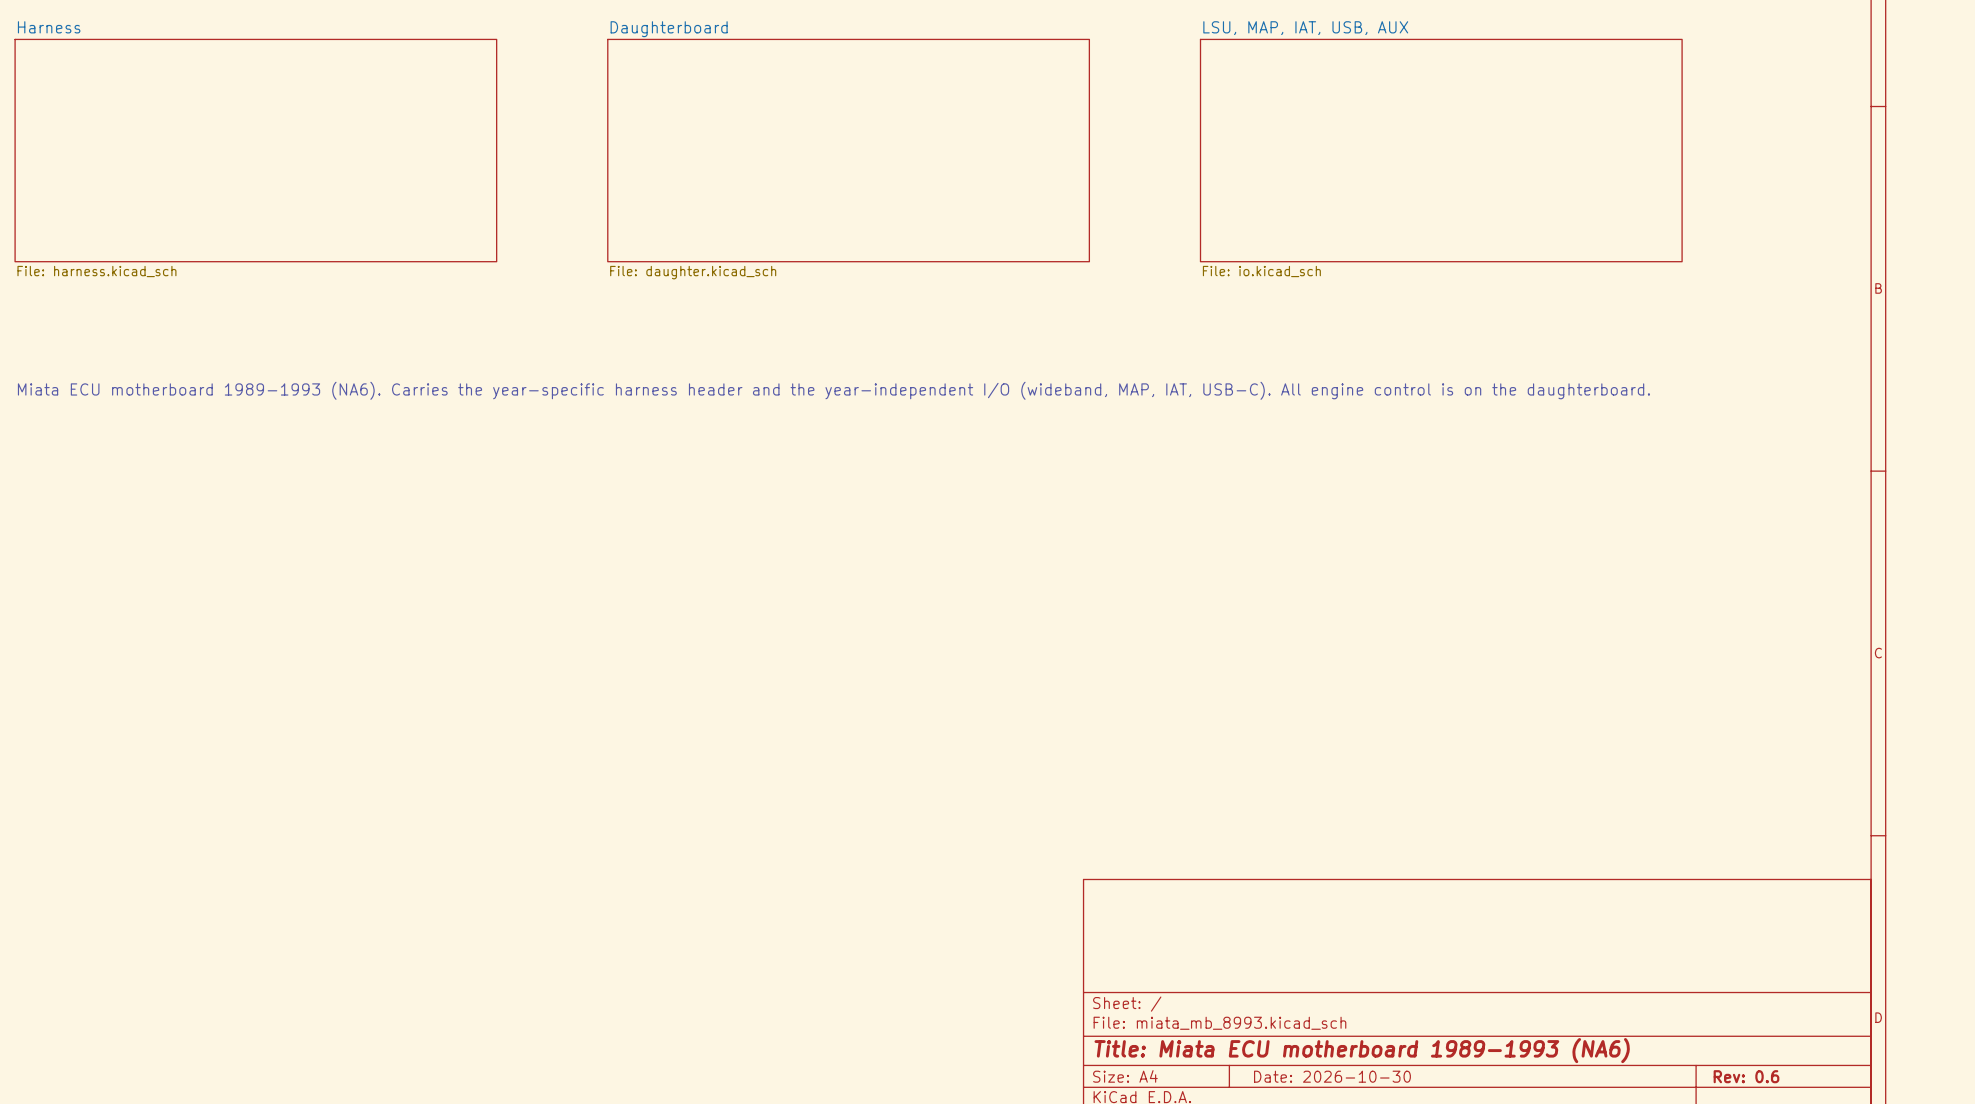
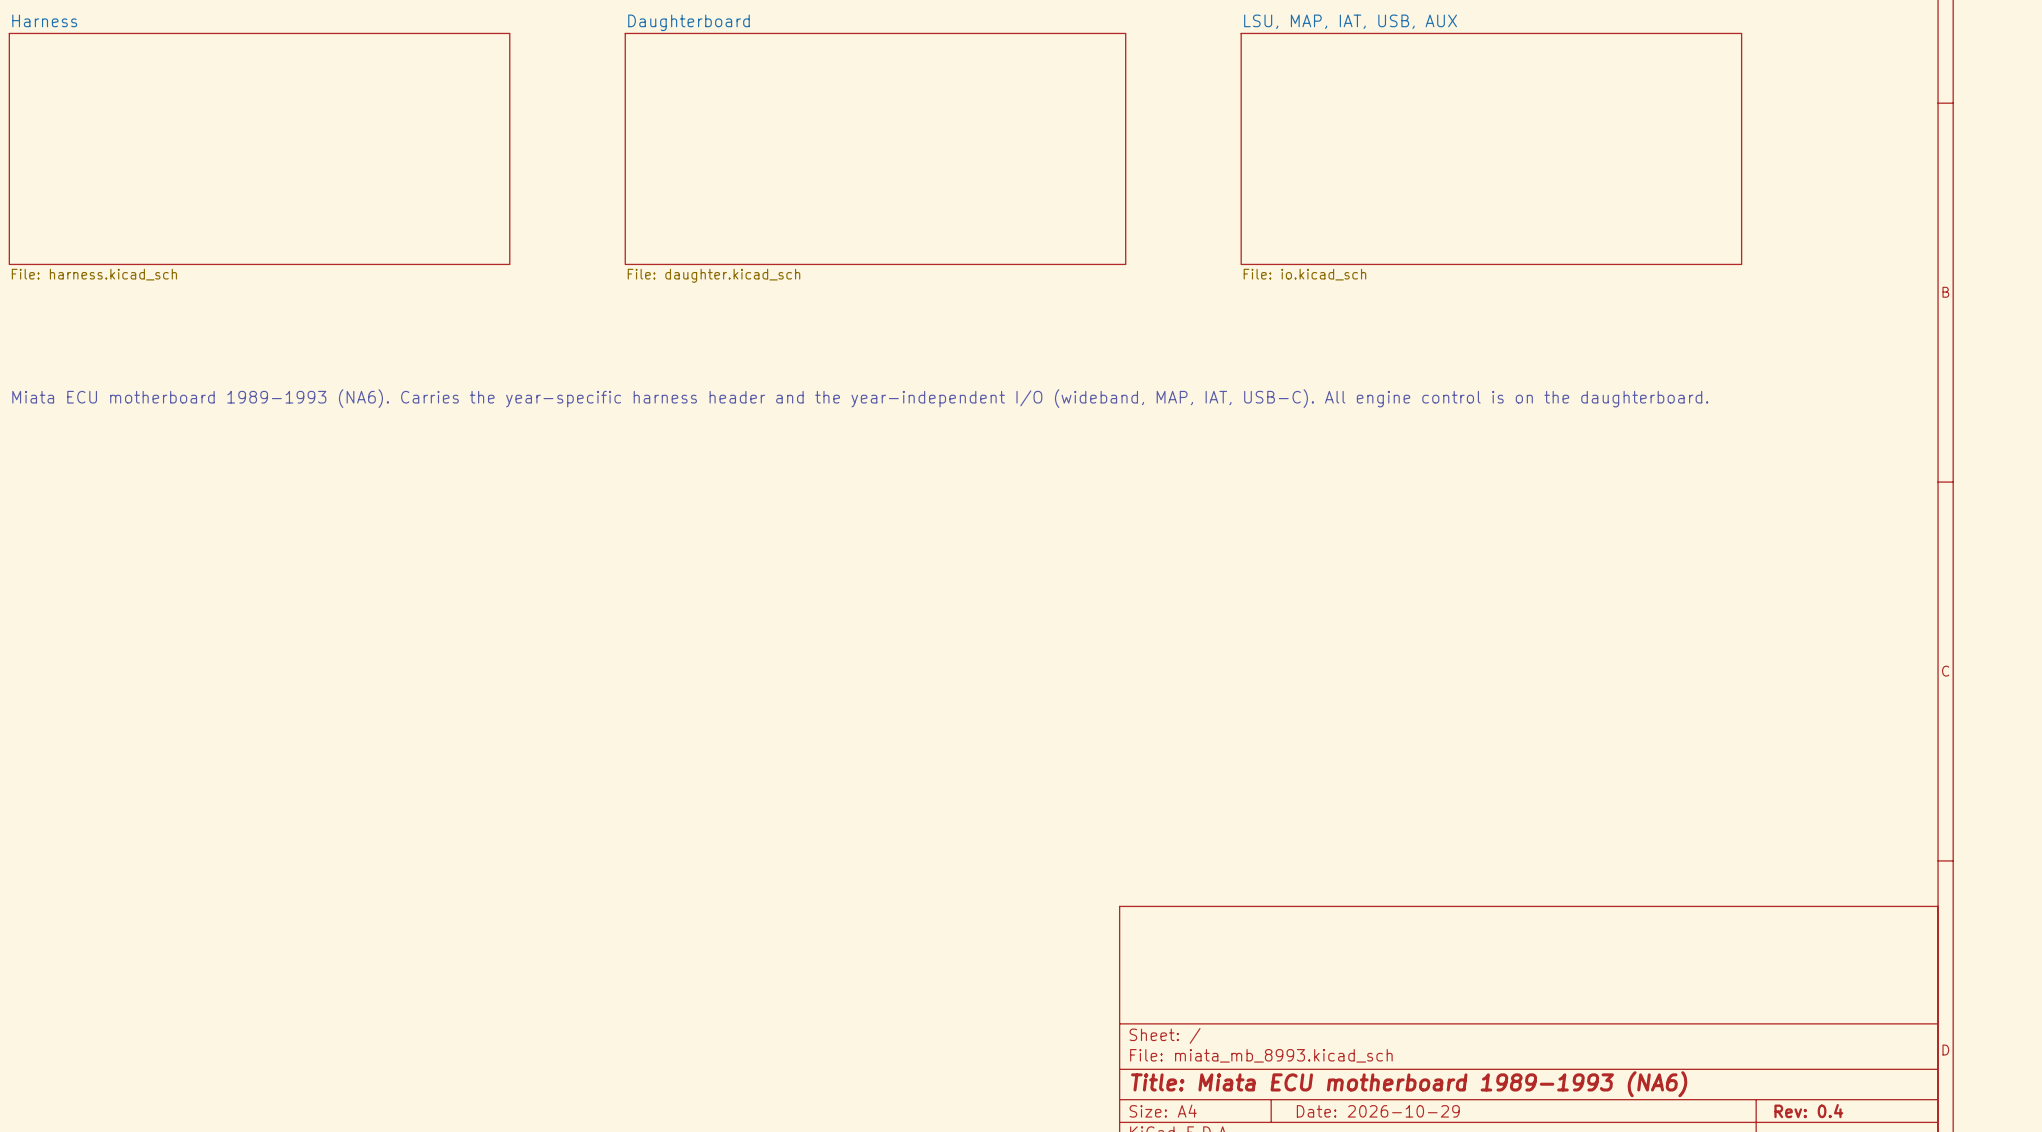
title block: Date: 2026-10-30 (1332, 1076) -> Date: 2026-10-29 (1378, 1111)
title block: Rev: 0.6 (1746, 1076) -> Rev: 0.4 (1808, 1111)

